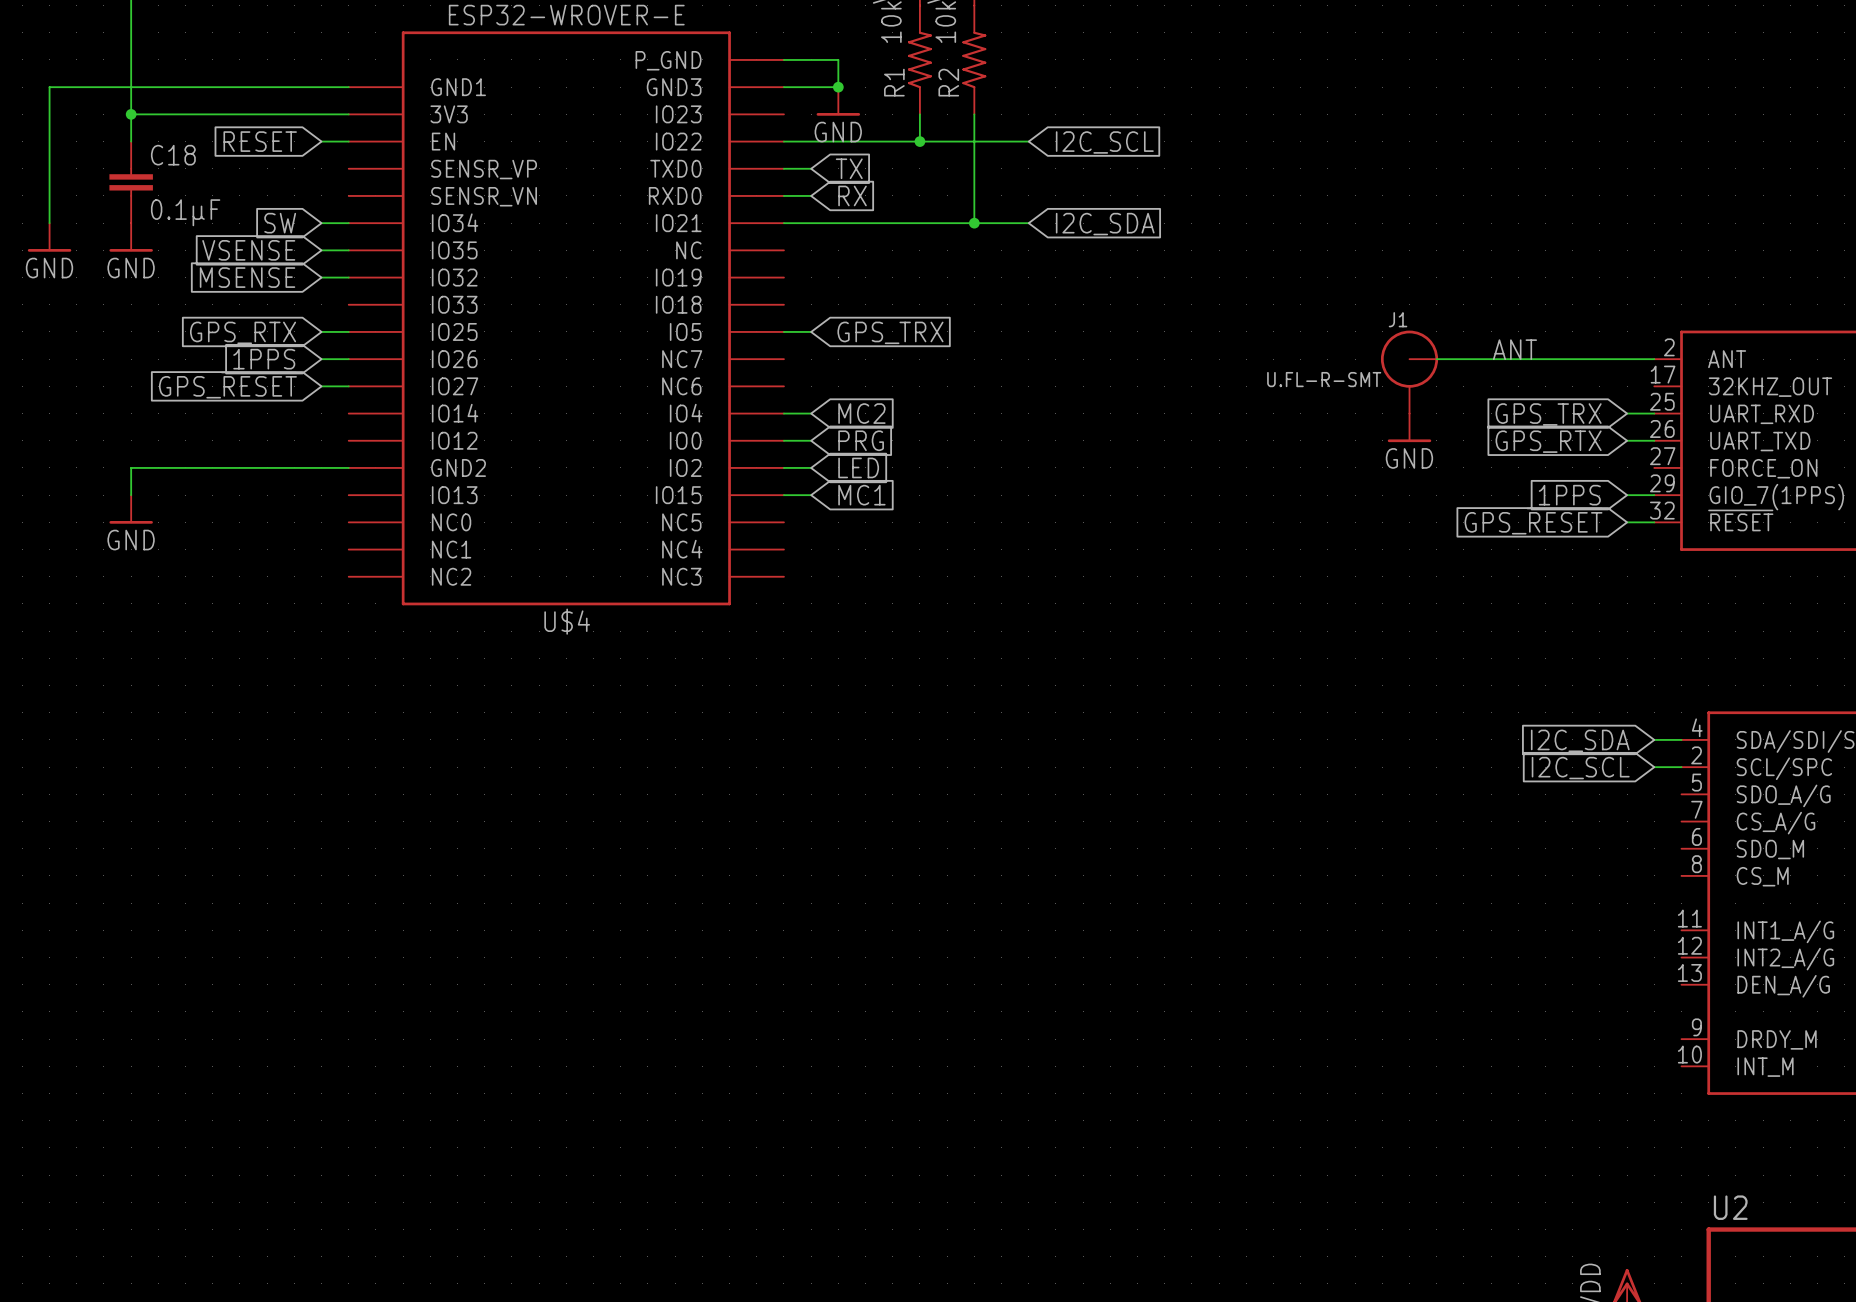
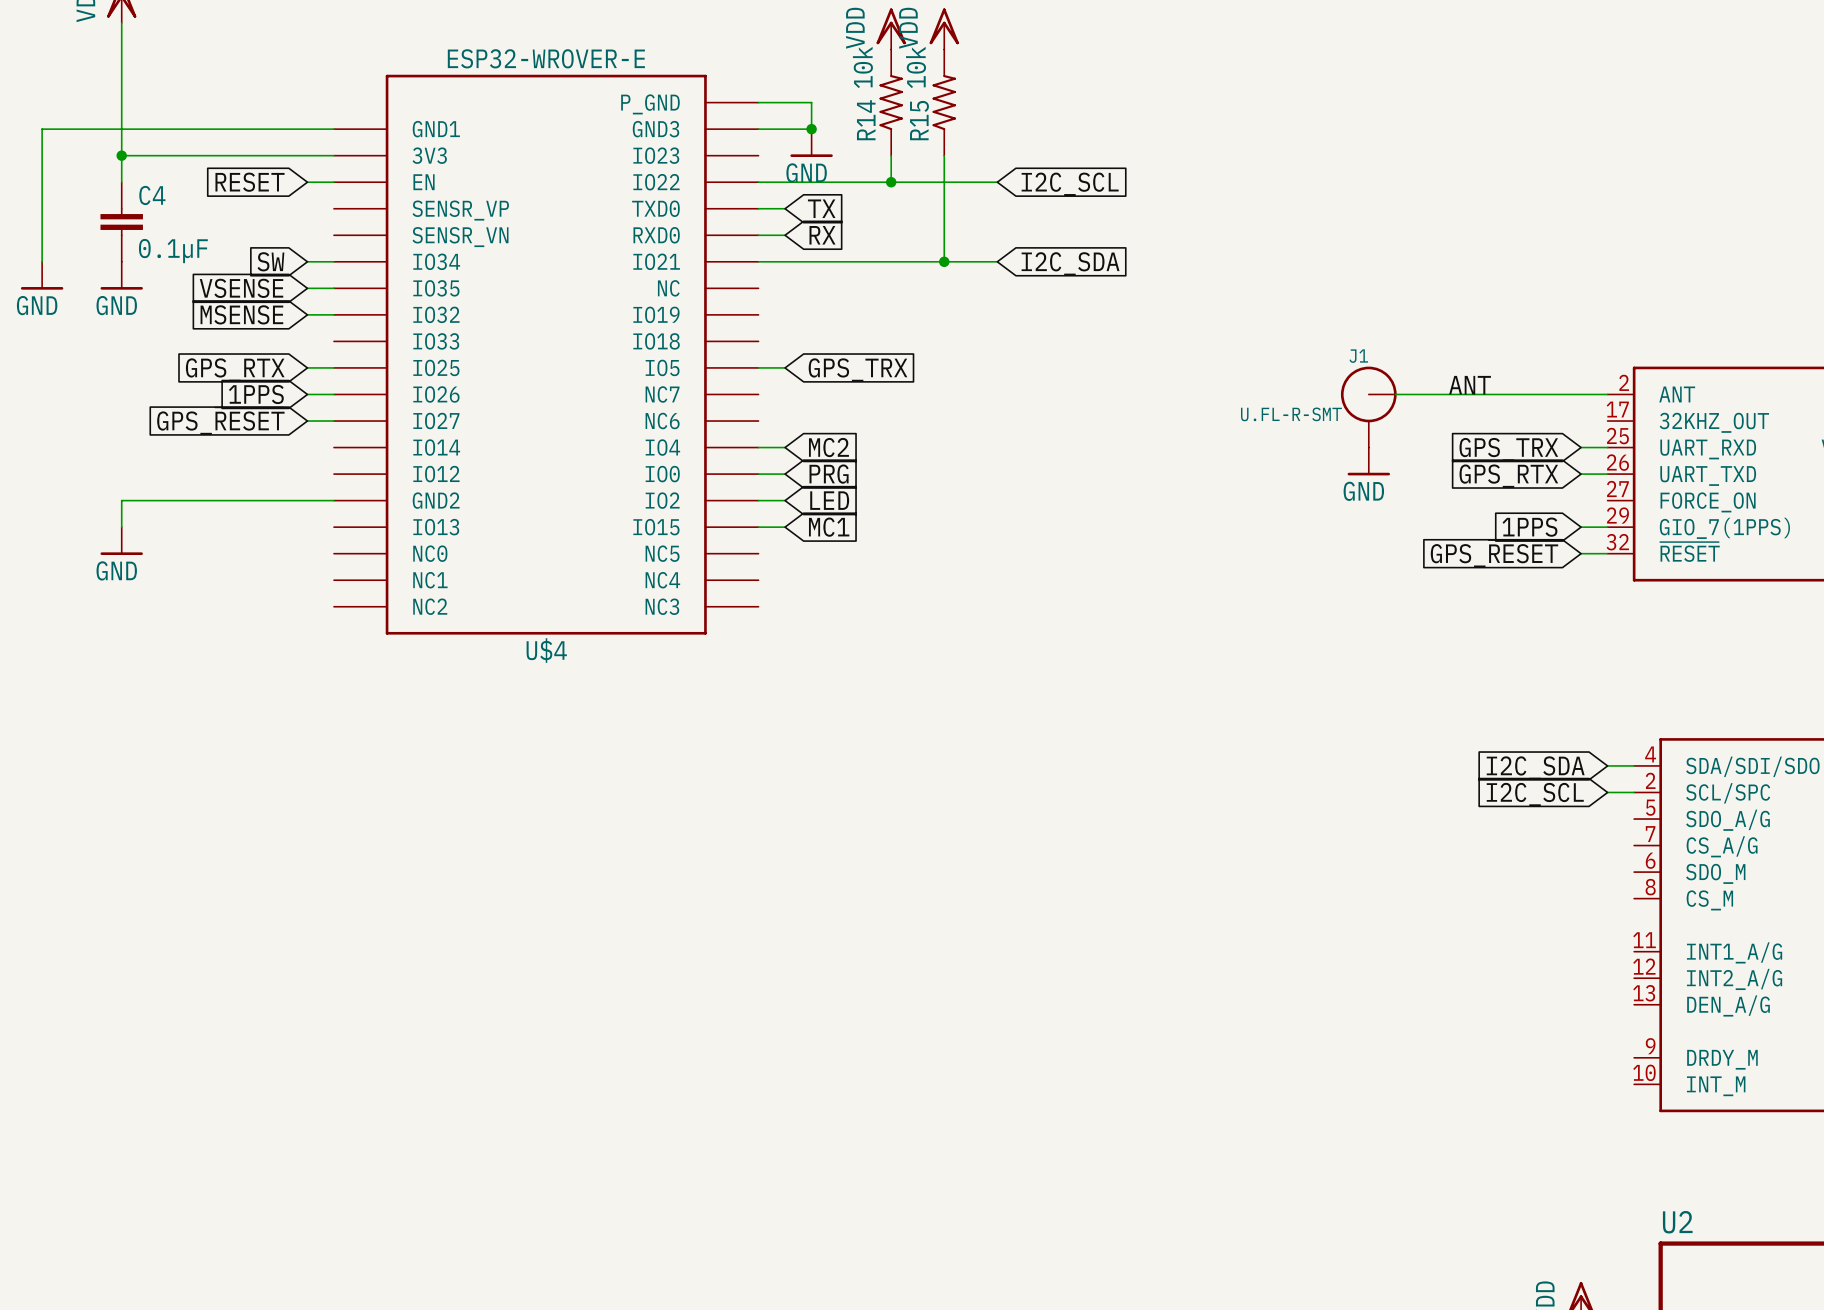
R1 name: R1 (894, 82) -> R14 (866, 120)
R2 name: R2 (948, 82) -> R15 (919, 120)
C18 name: C18 (173, 155) -> C4 (152, 195)

